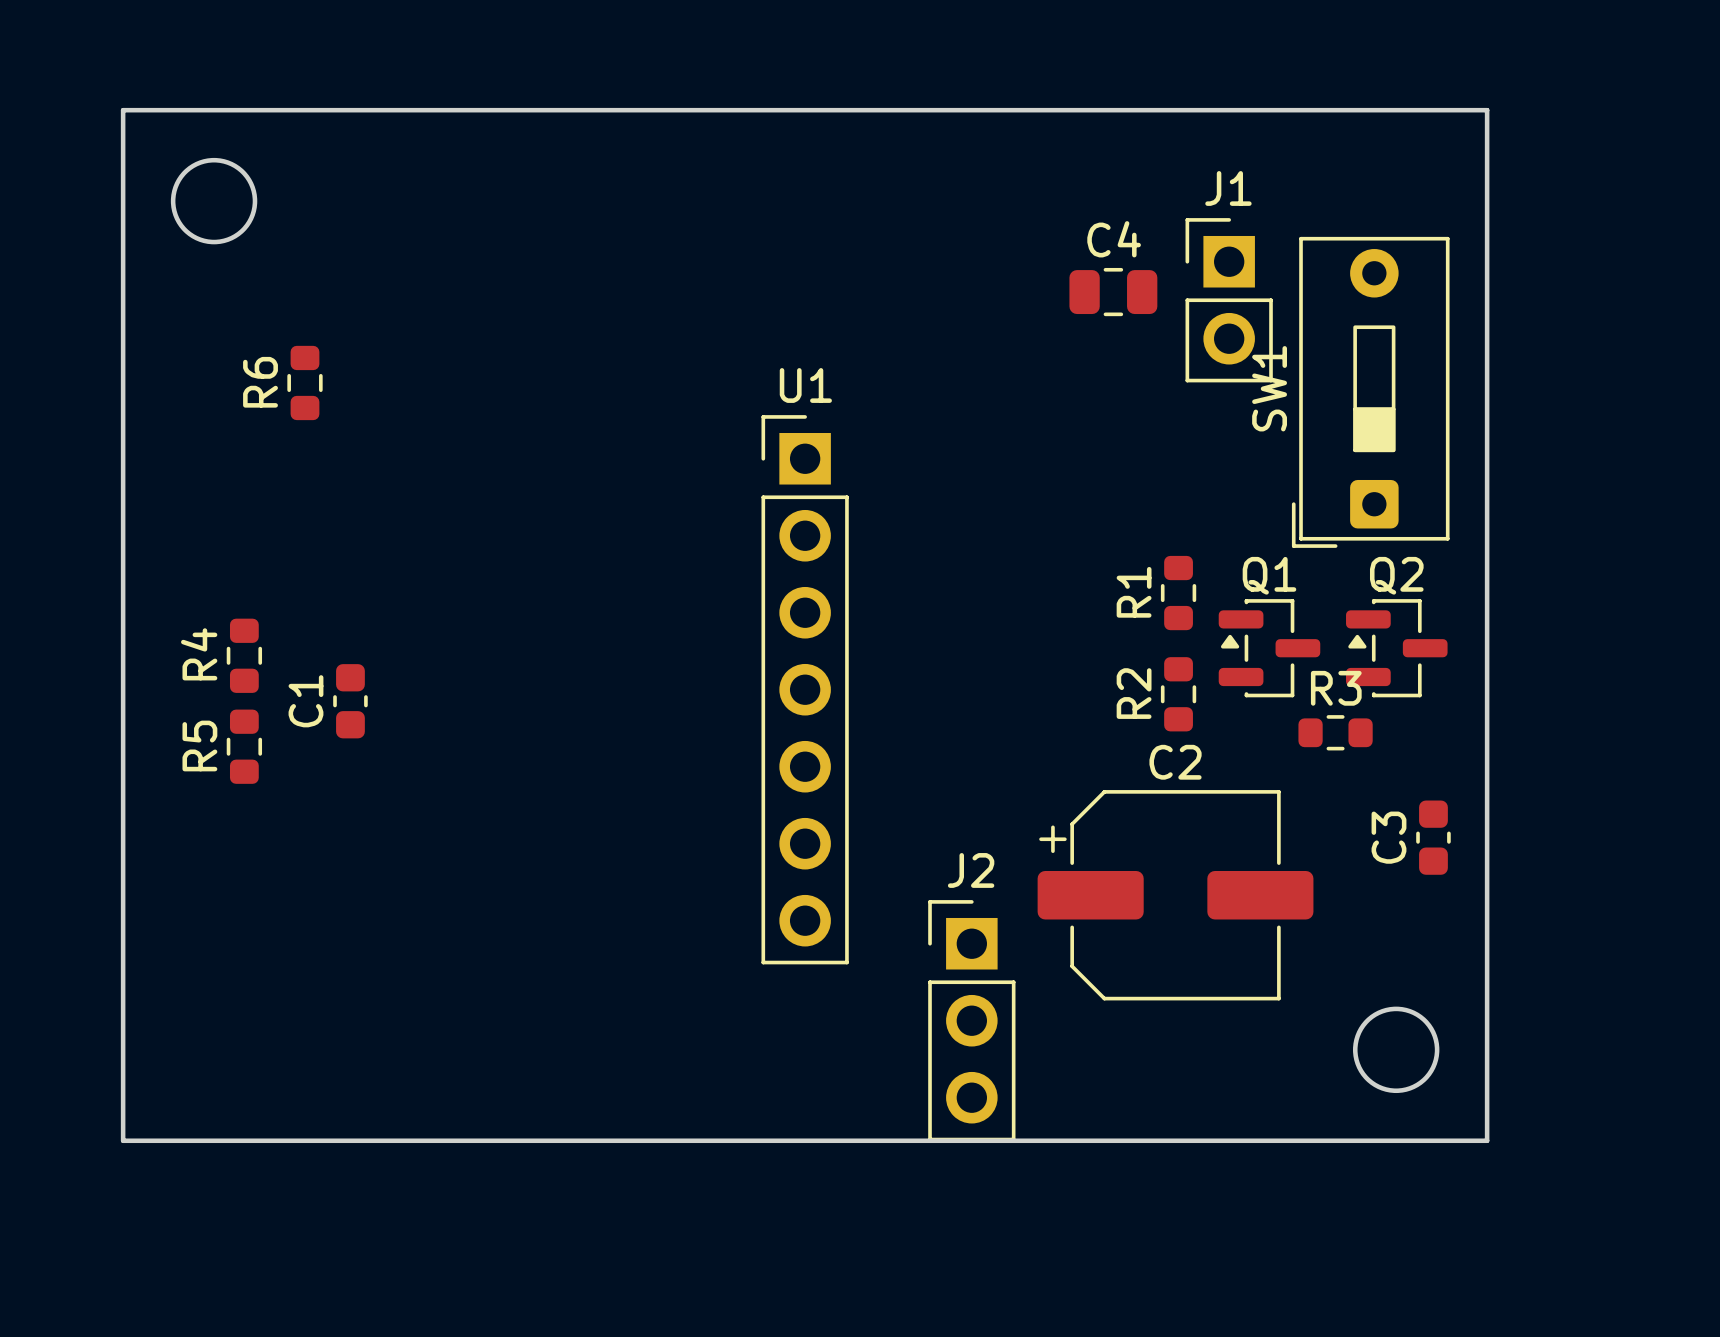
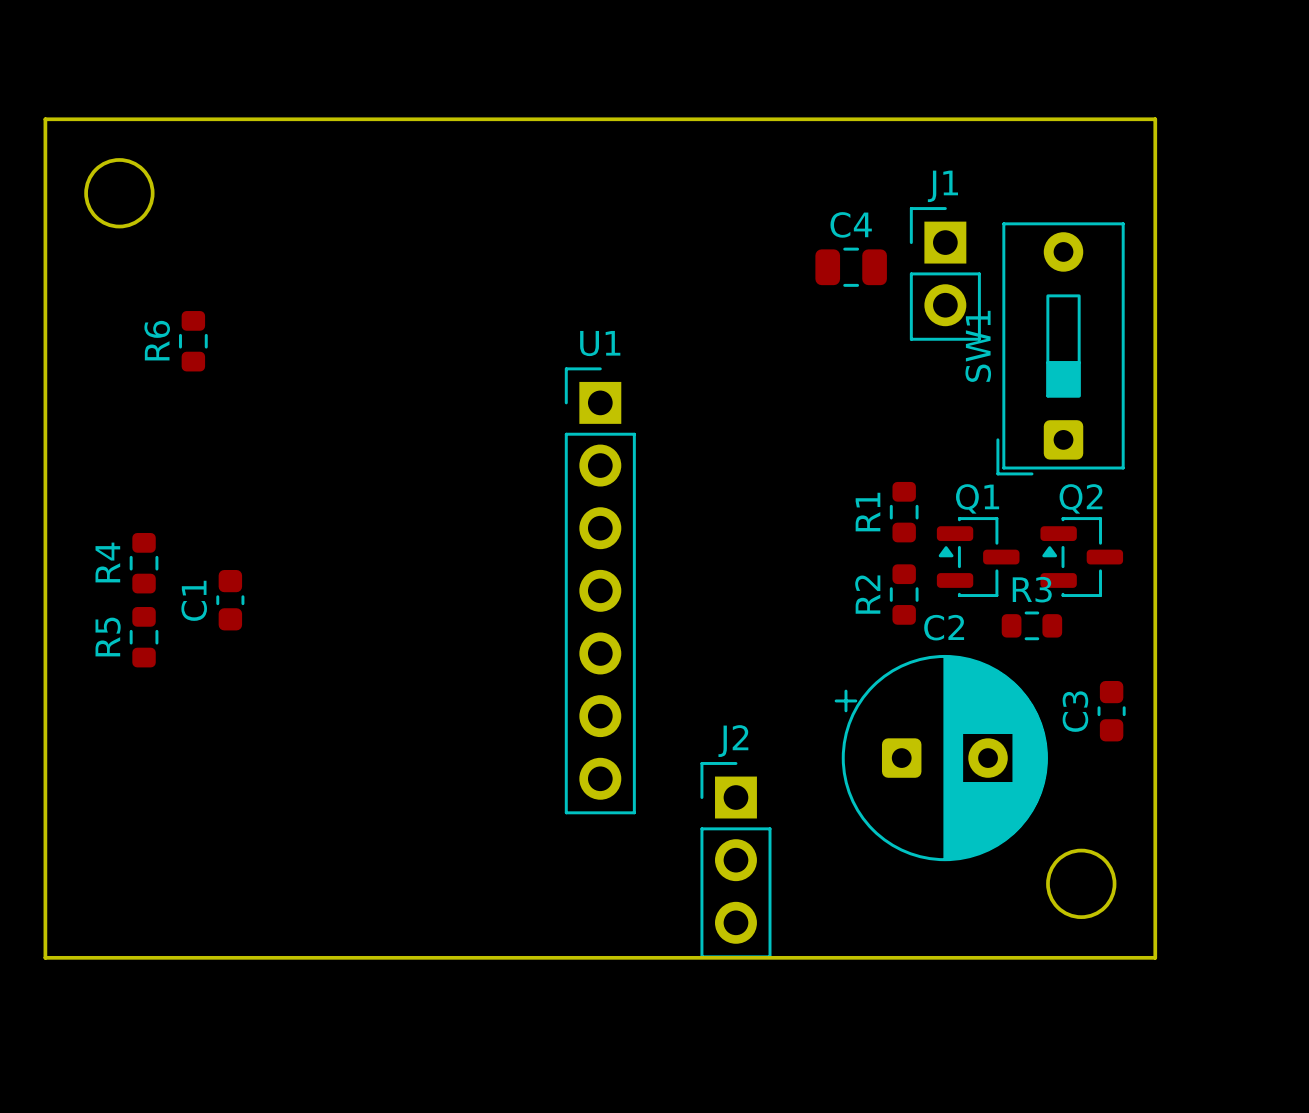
C2 footprint: [1037, 790, 1314, 1001] -> [834, 654, 1048, 862]

